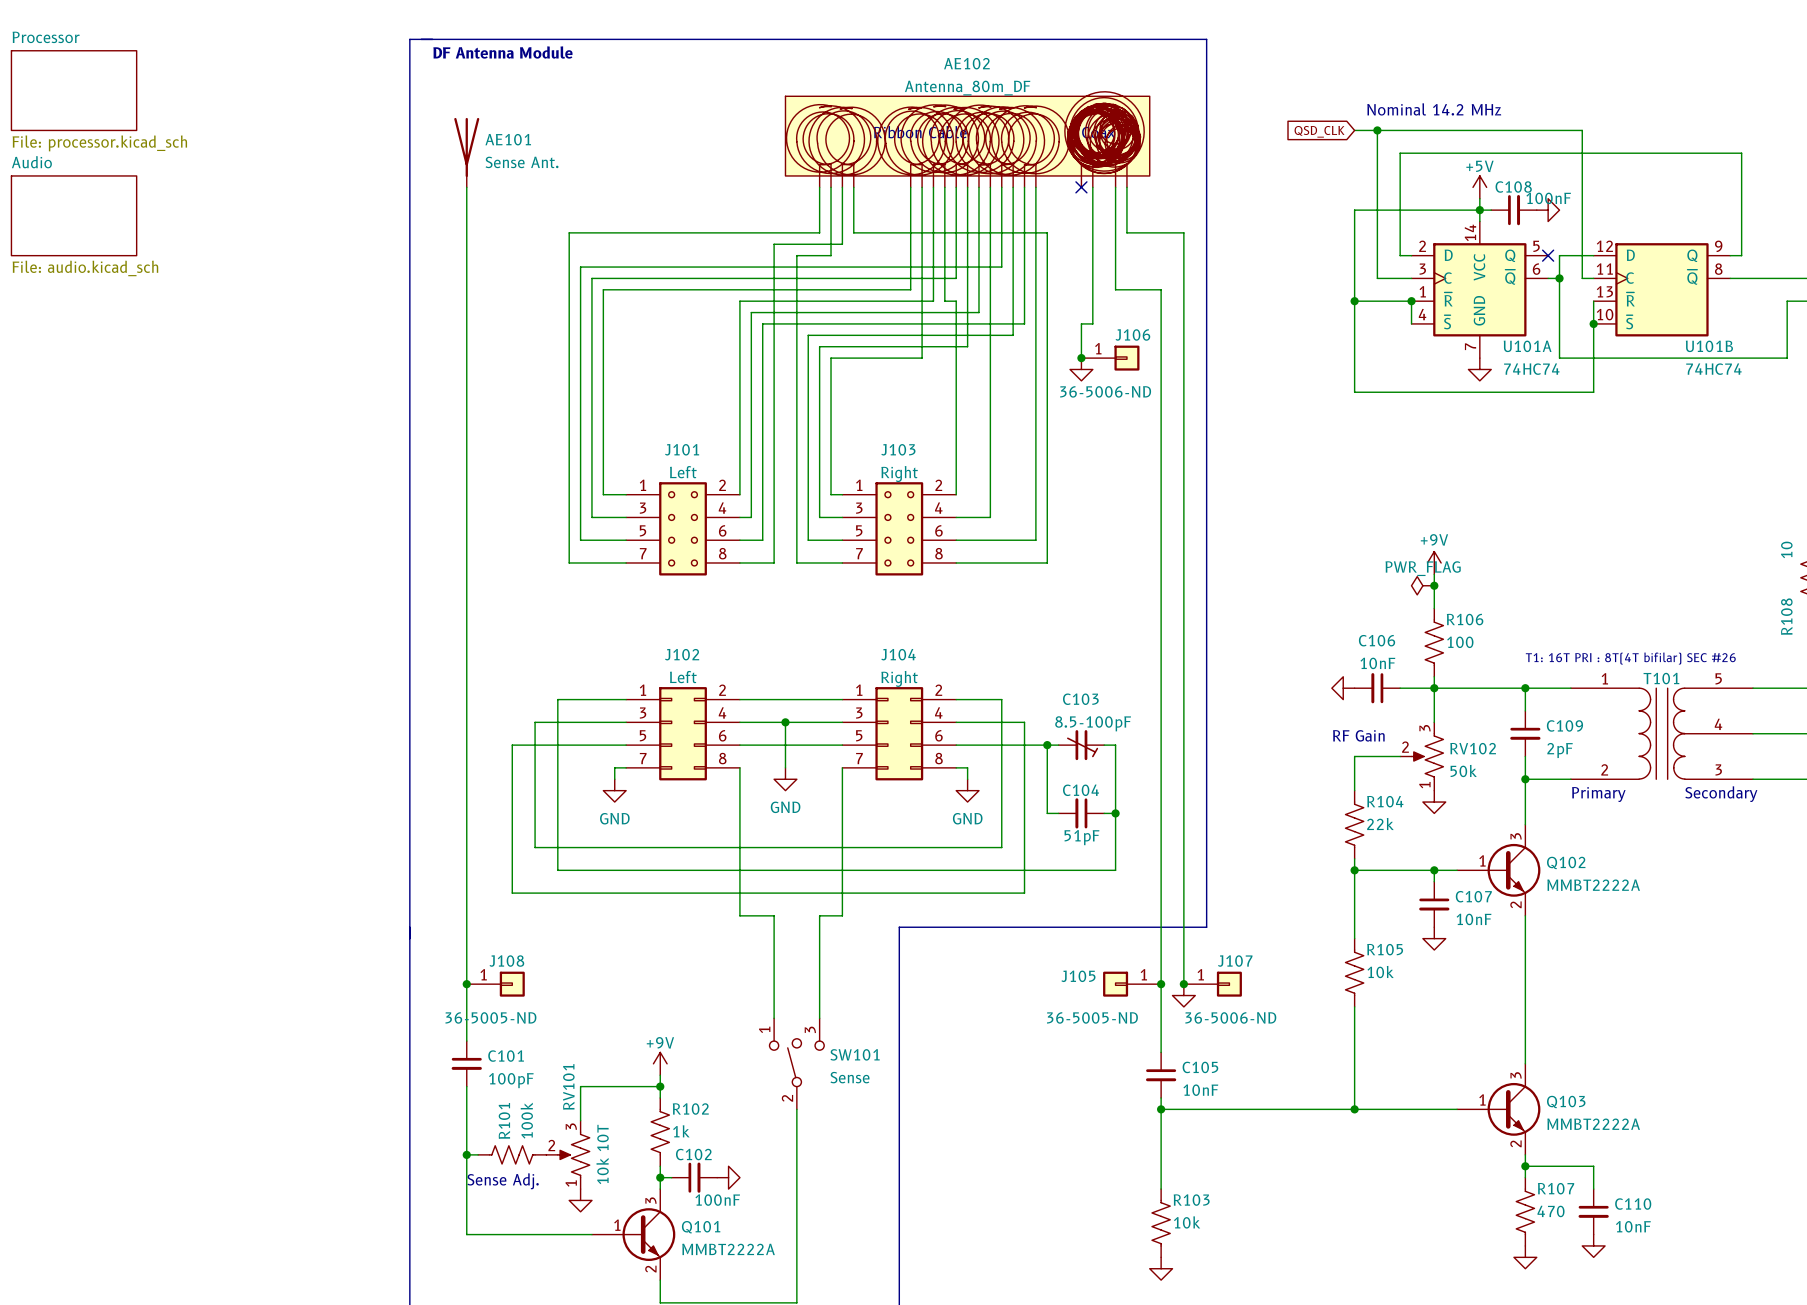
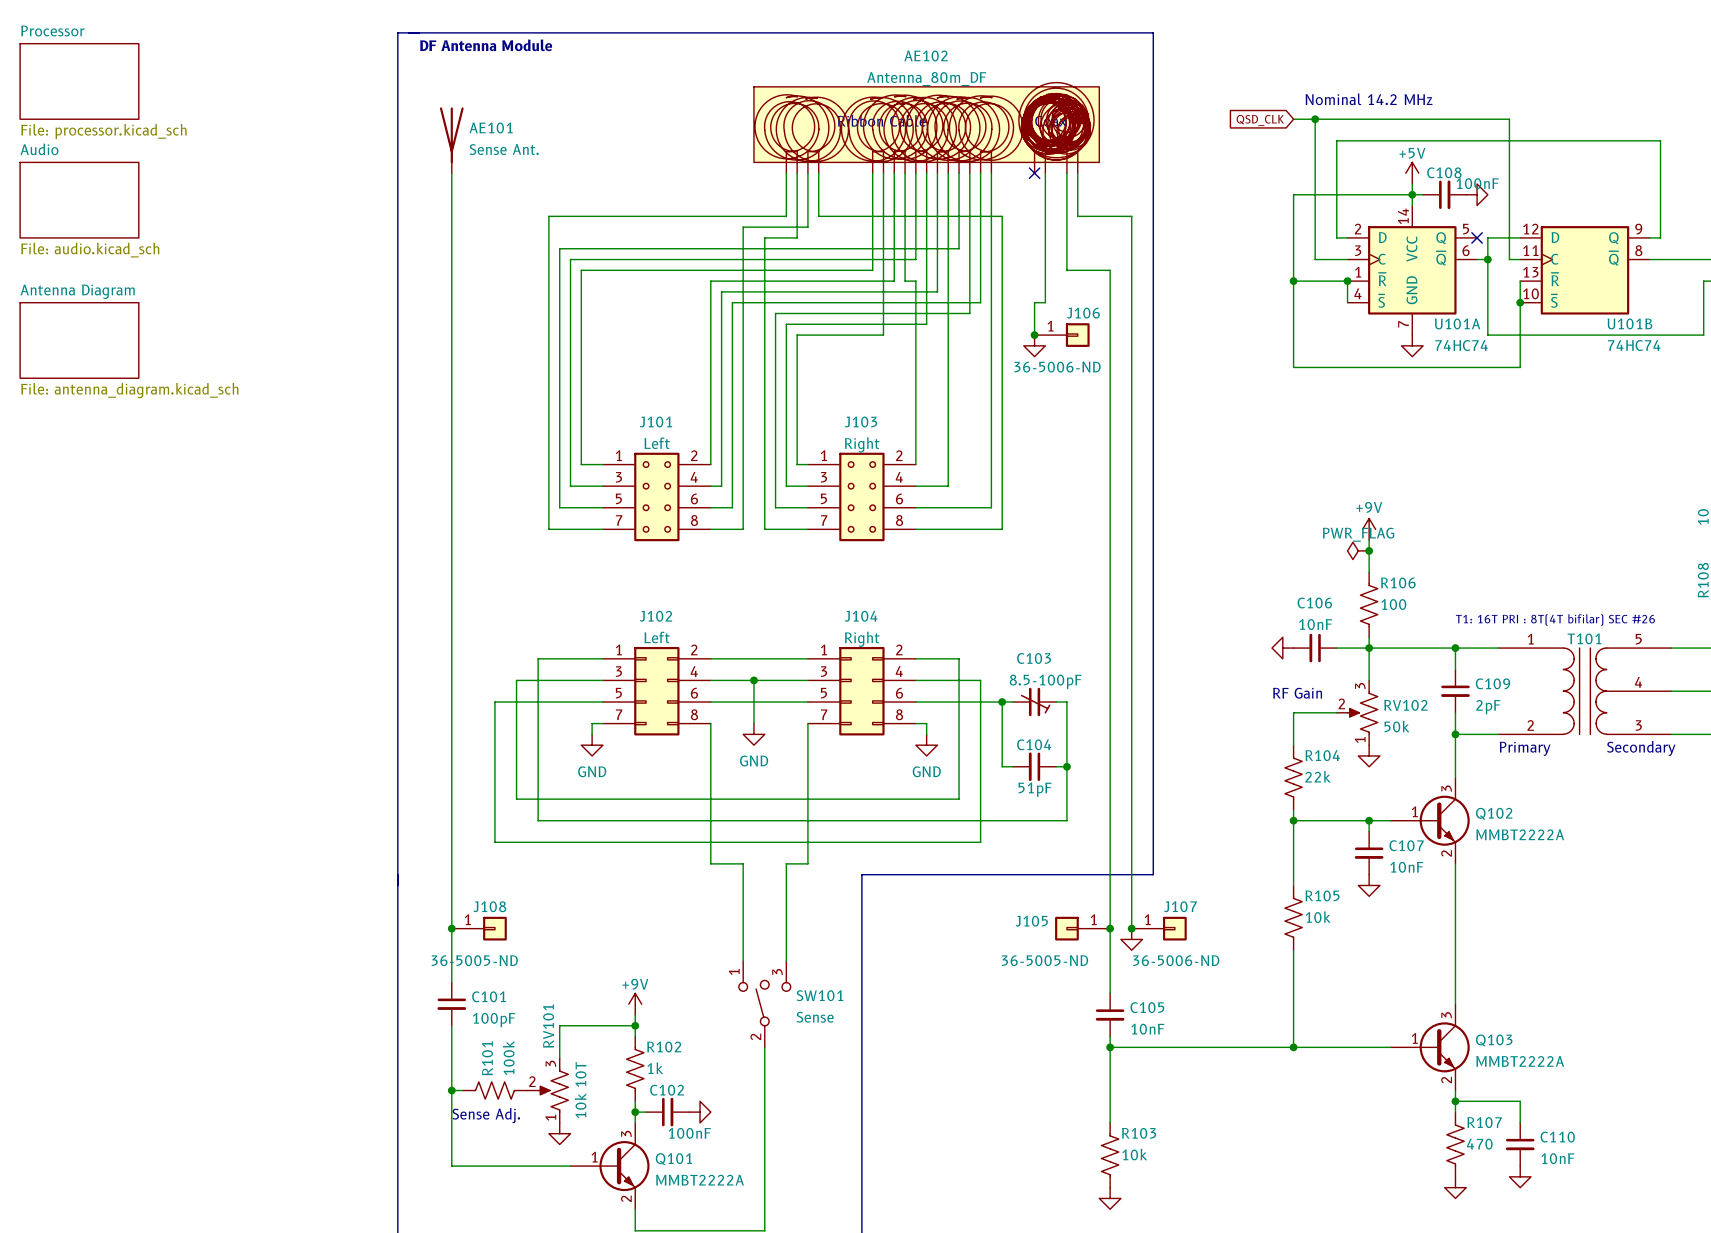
sheet Antenna Diagram: none -> File: antenna_diagram.kicad_sch (79, 340)

